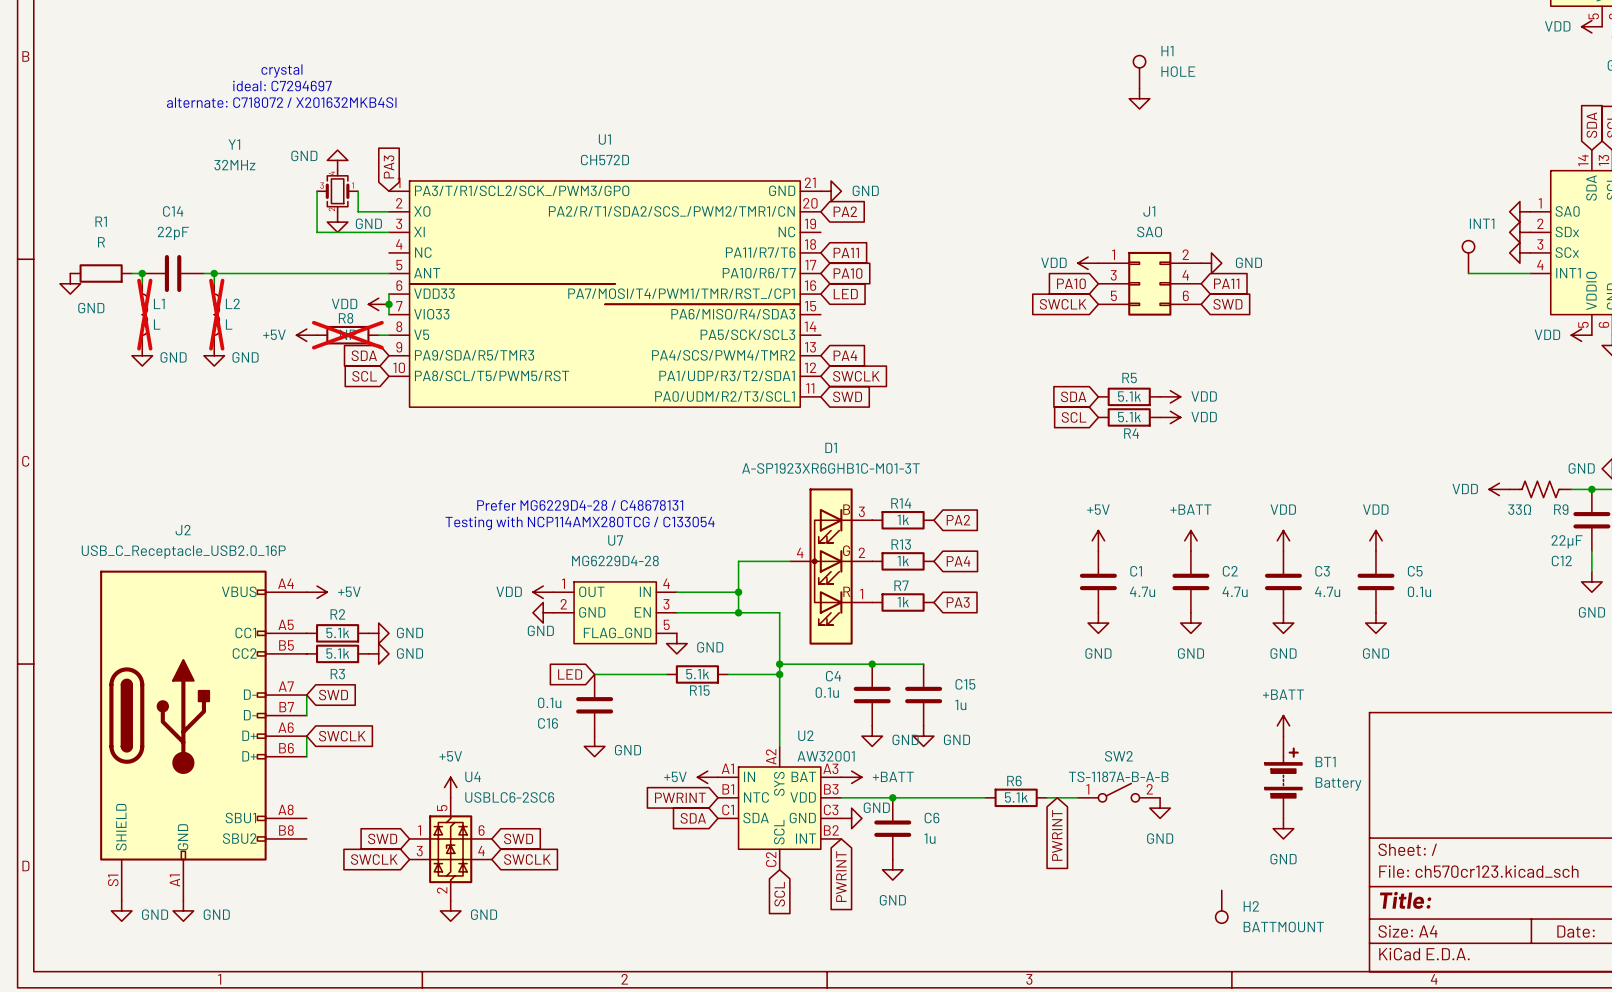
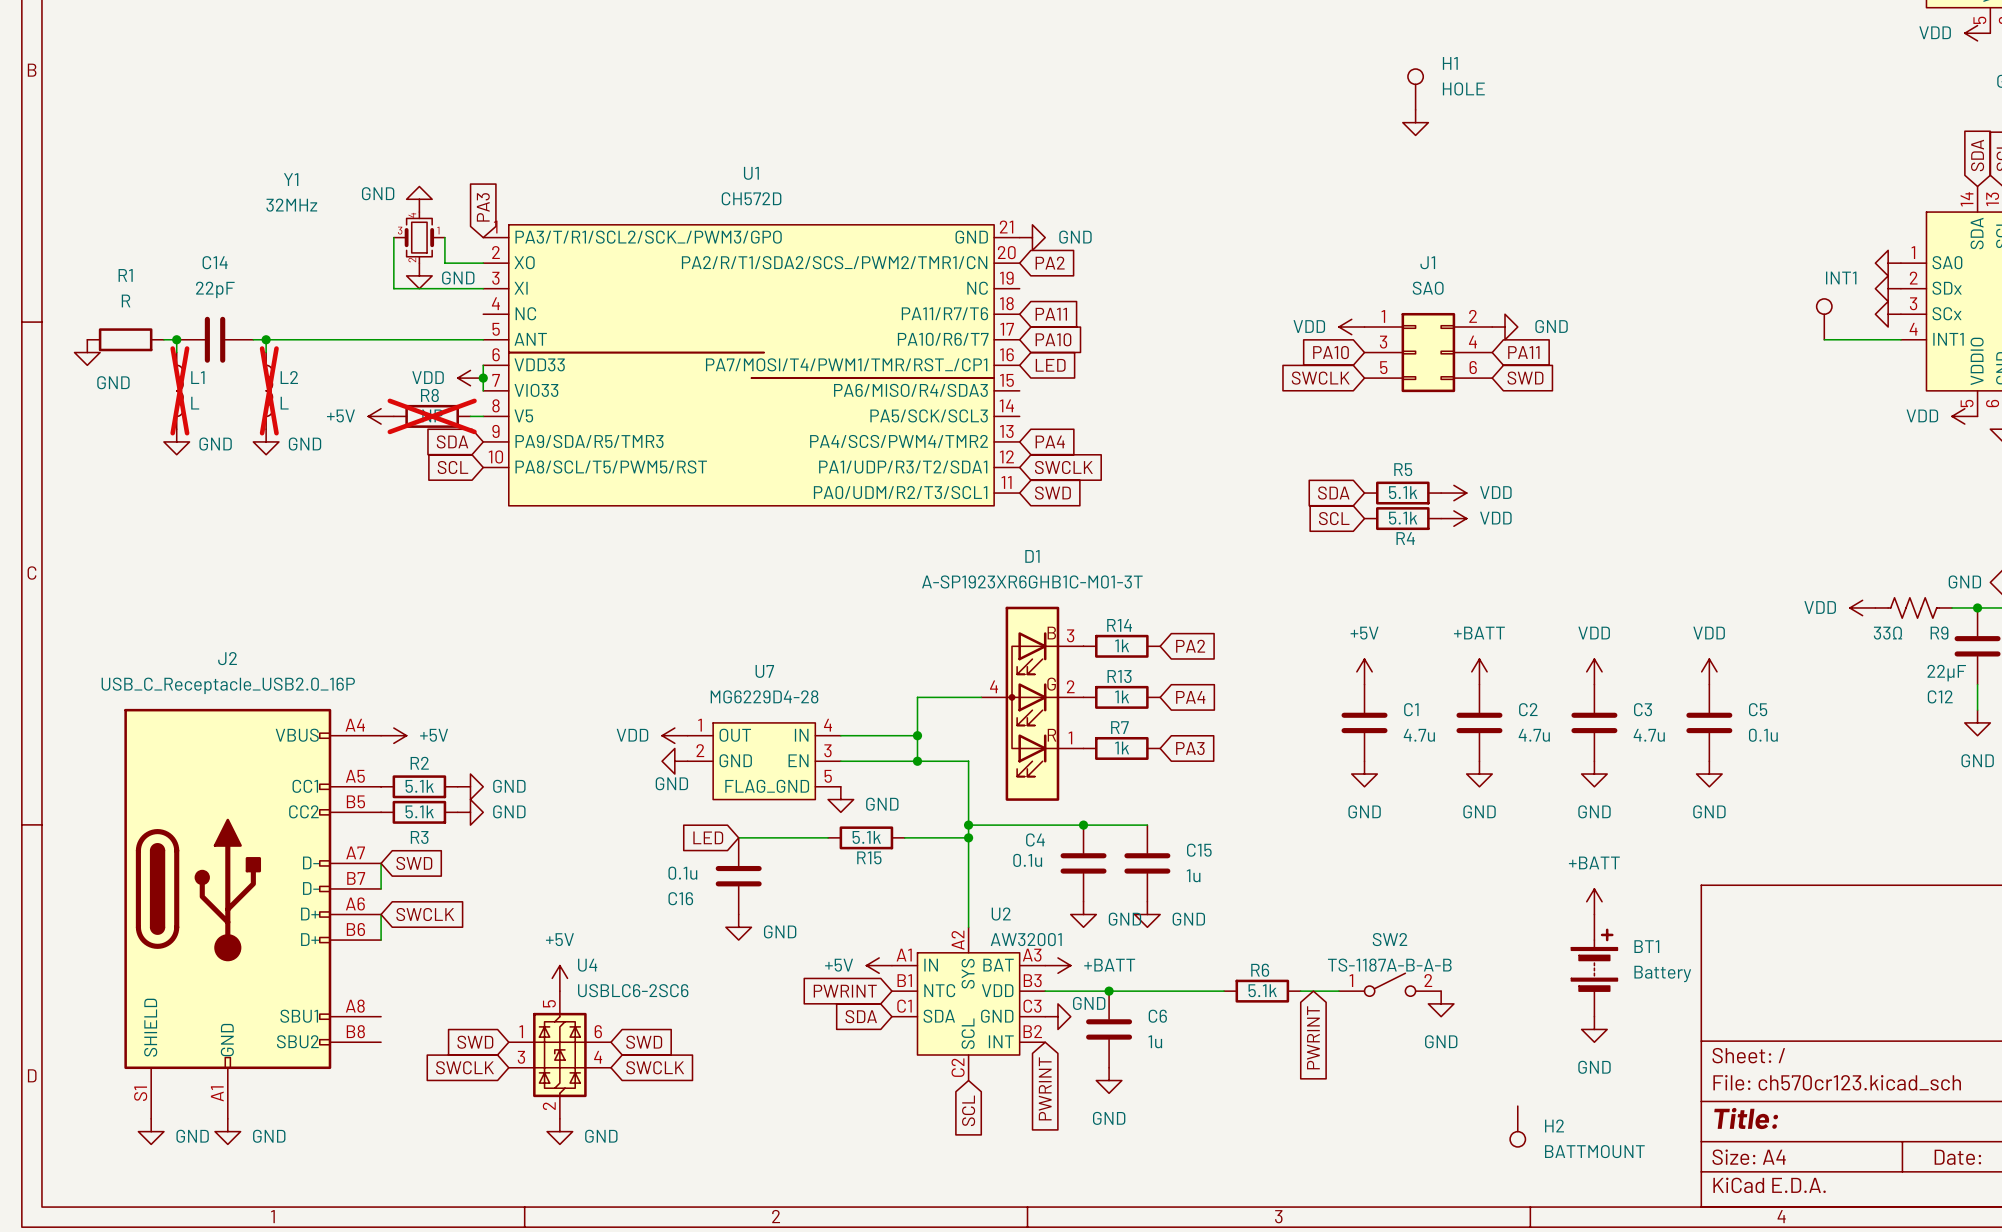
text: crystal (281, 70) -> none
text: ideal: C7294697 (282, 86) -> none
text: alternate: C718072 / X201632MKB4SI (281, 102) -> none
text: Prefer MG6229D4-28 / C48678131 (580, 505) -> none
text: Testing with NCP114AMX280TCG / C133054 (580, 523) -> none

